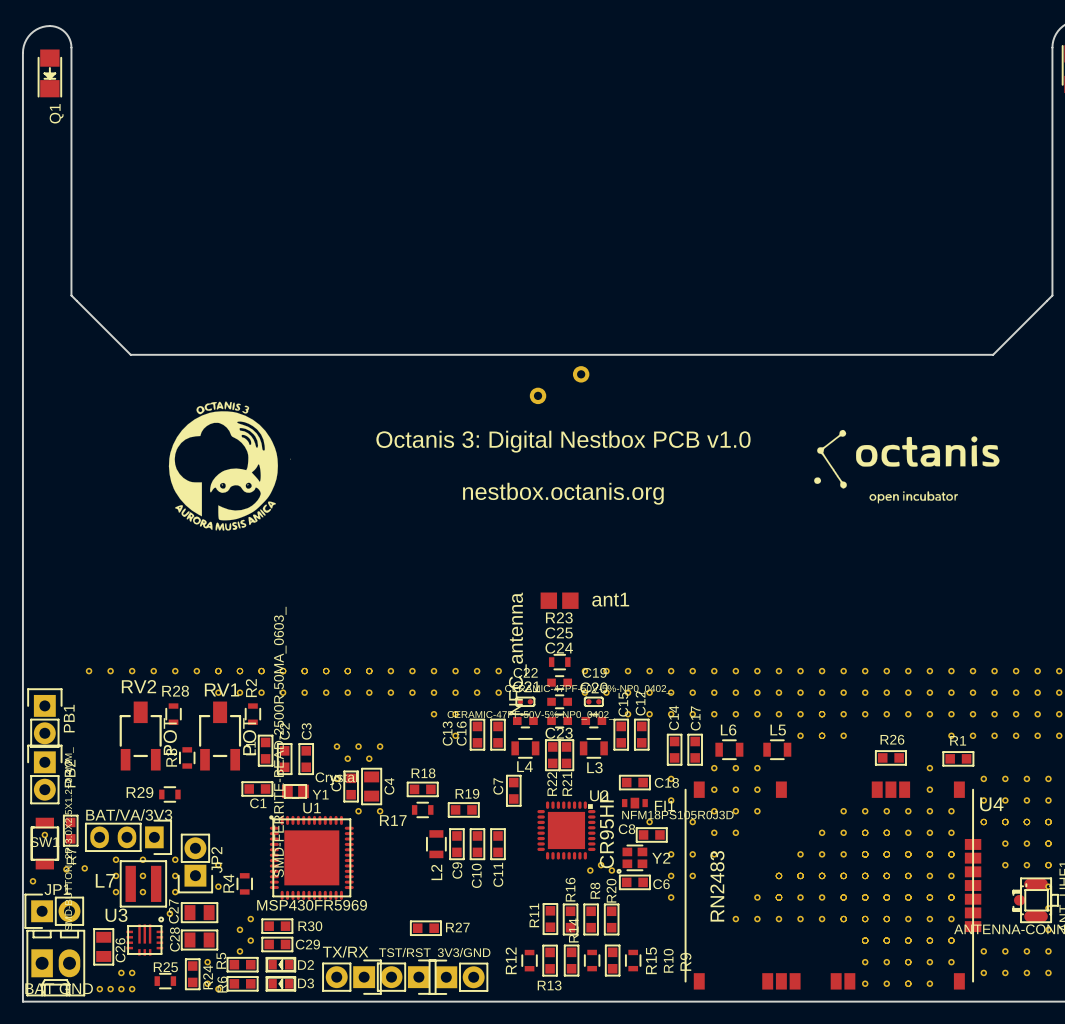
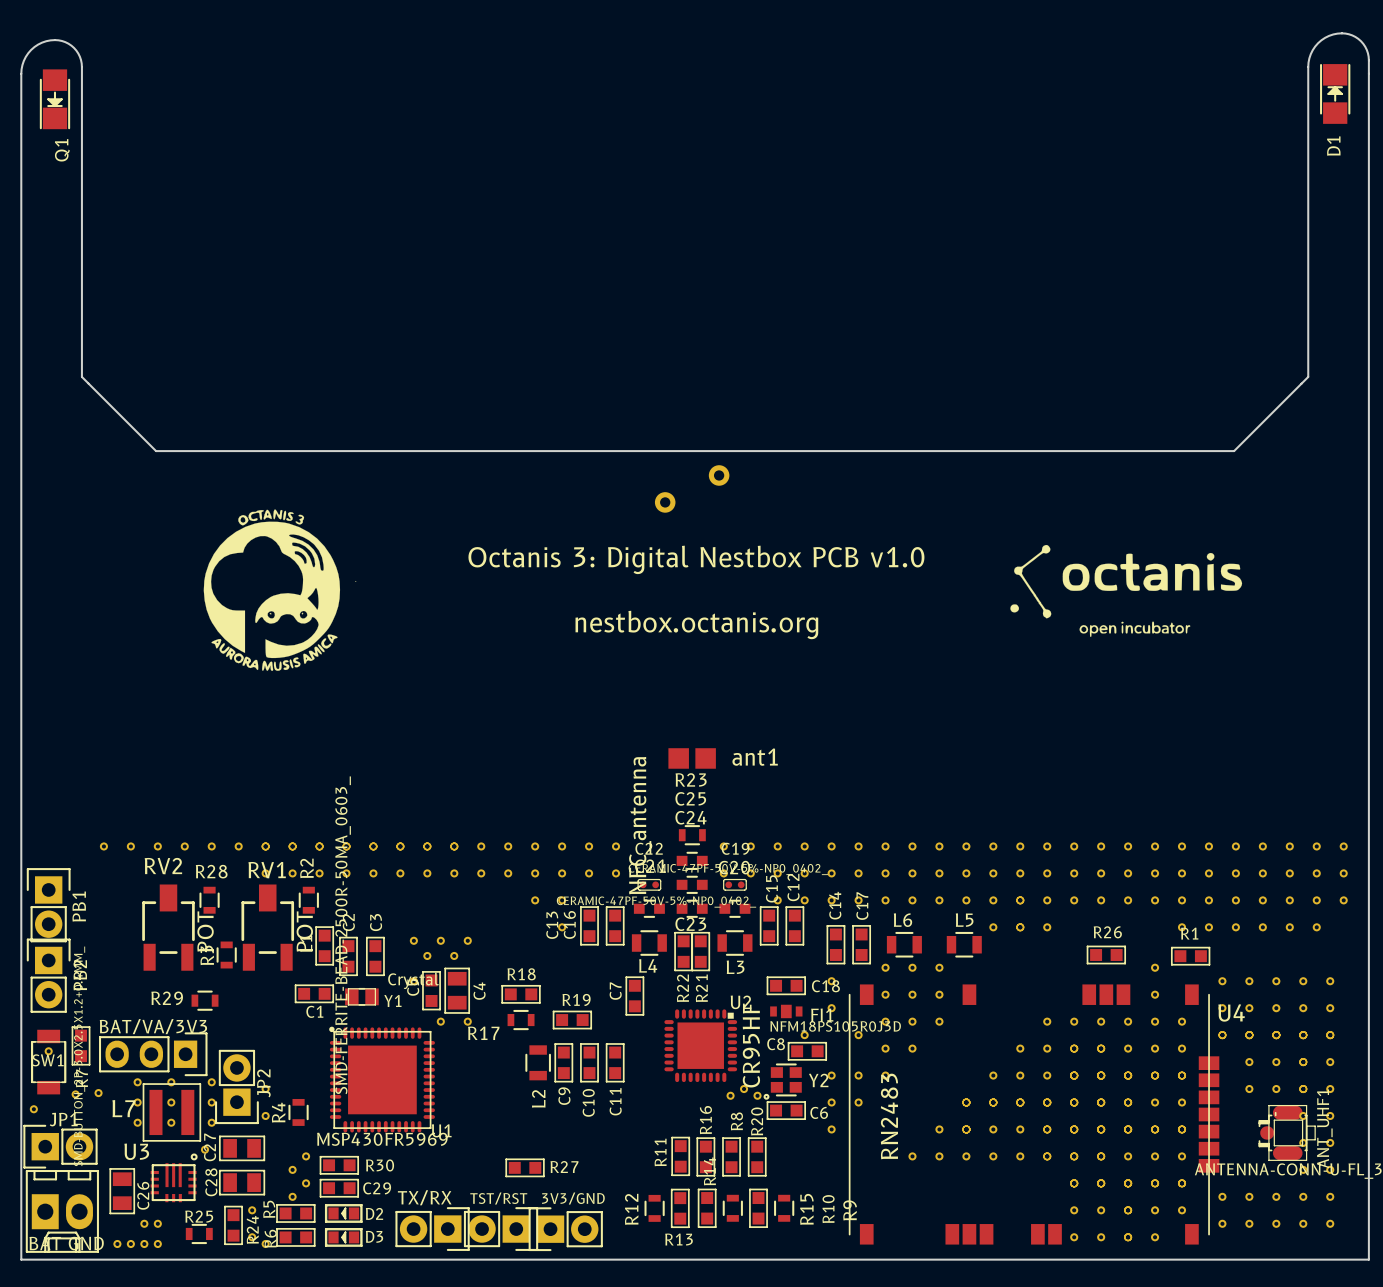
U1 name position: U1 (312, 808) -> U1 (441, 1130)

